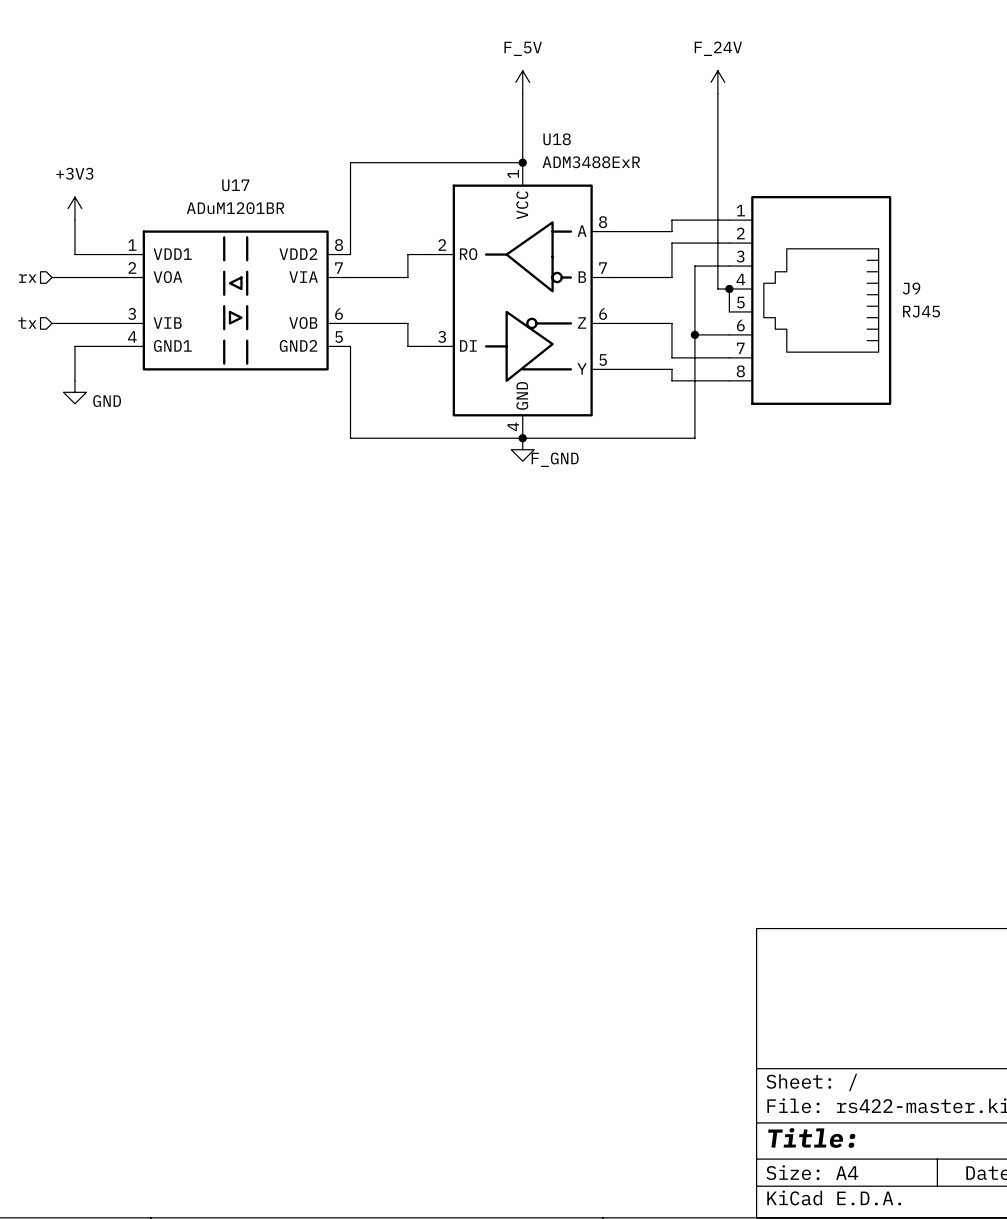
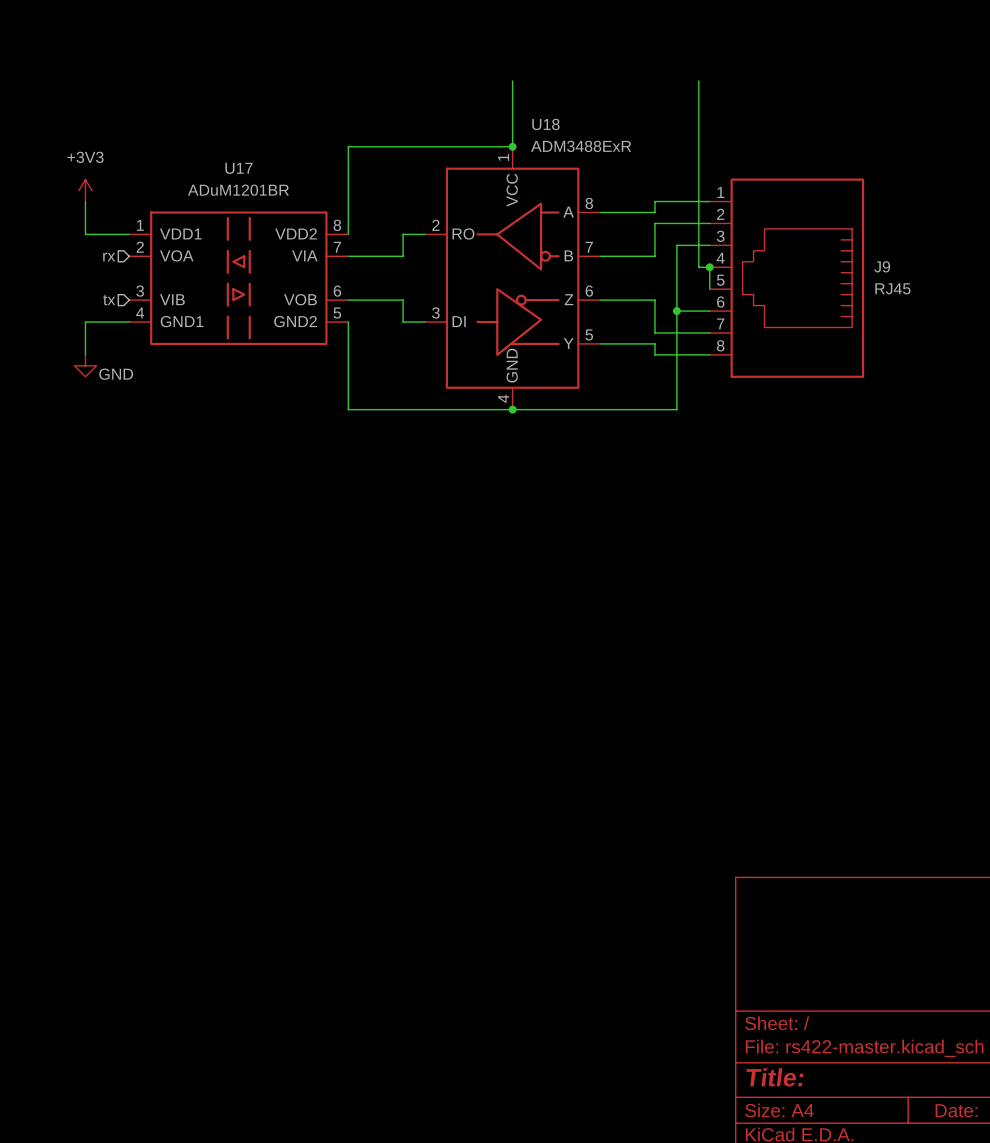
power symbol: F_5V (522, 82) -> none
power symbol: F_24V (717, 82) -> none
wire: (52, 277) (120, 277) -> none
hierarchical label position: rx (27, 278) -> rx (109, 257)
hierarchical label position: tx (27, 323) -> tx (109, 300)
wire: (52, 323) (120, 323) -> none
power symbol: F_GND (522, 449) -> none

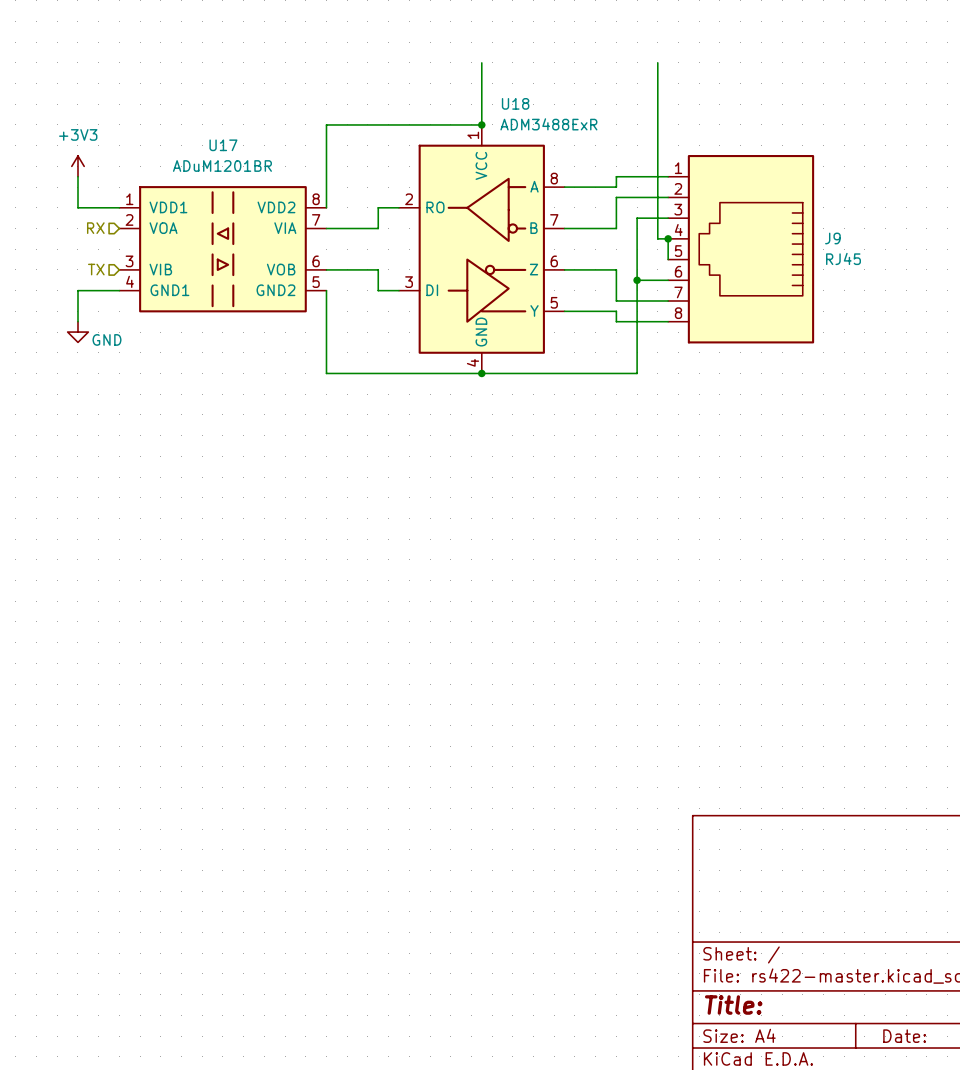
hierarchical label: rx (109, 257) -> RX (95, 228)
hierarchical label: tx (109, 300) -> TX (96, 269)

